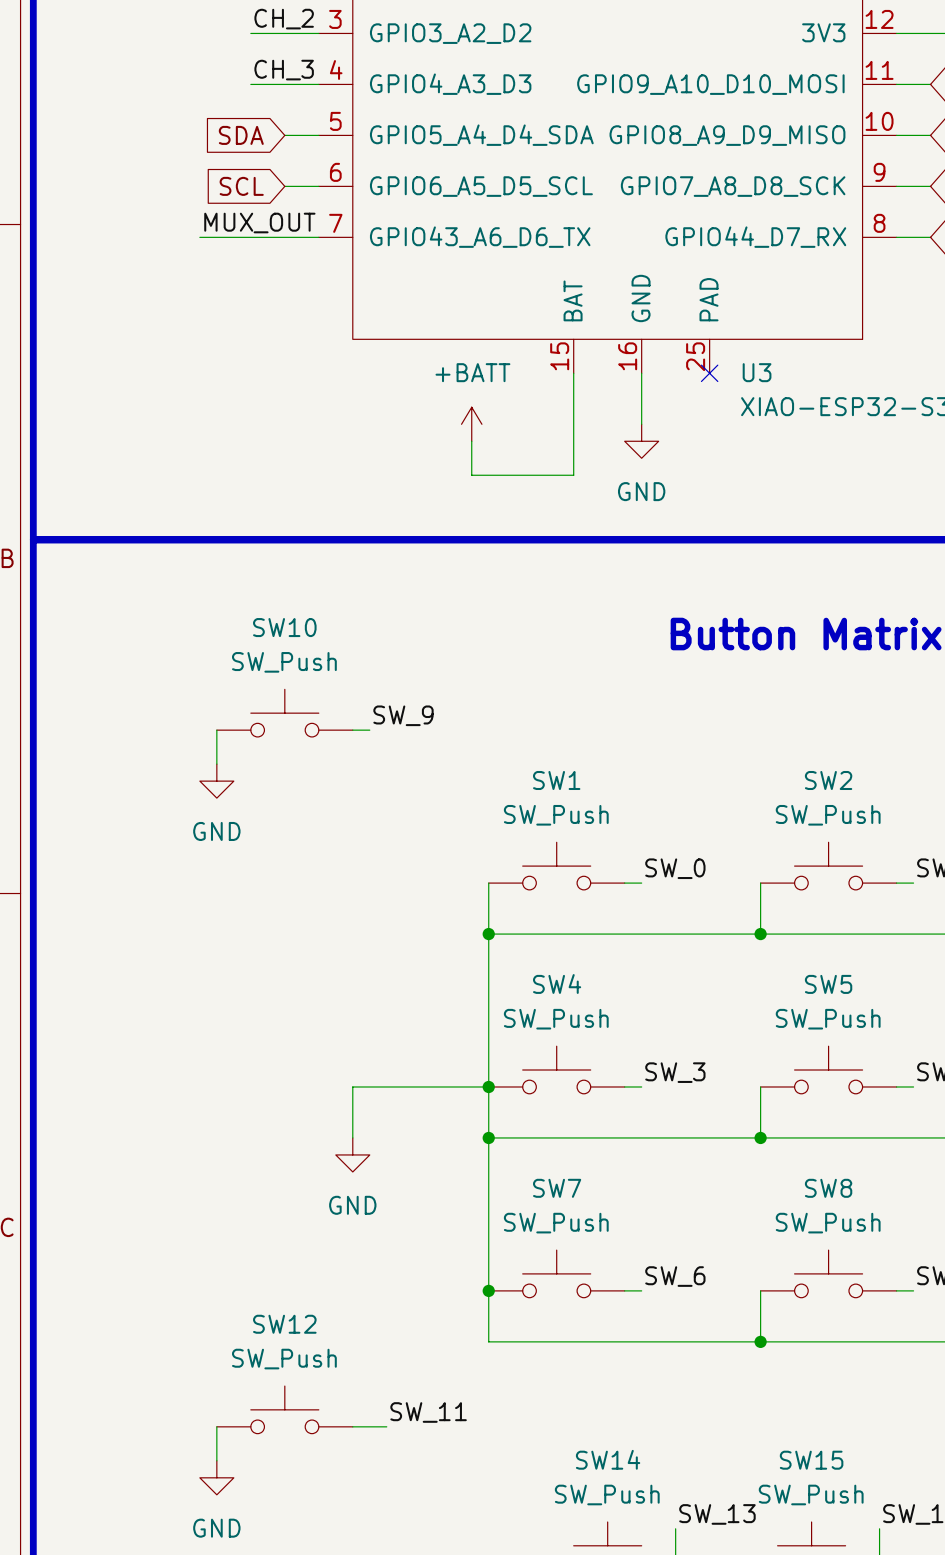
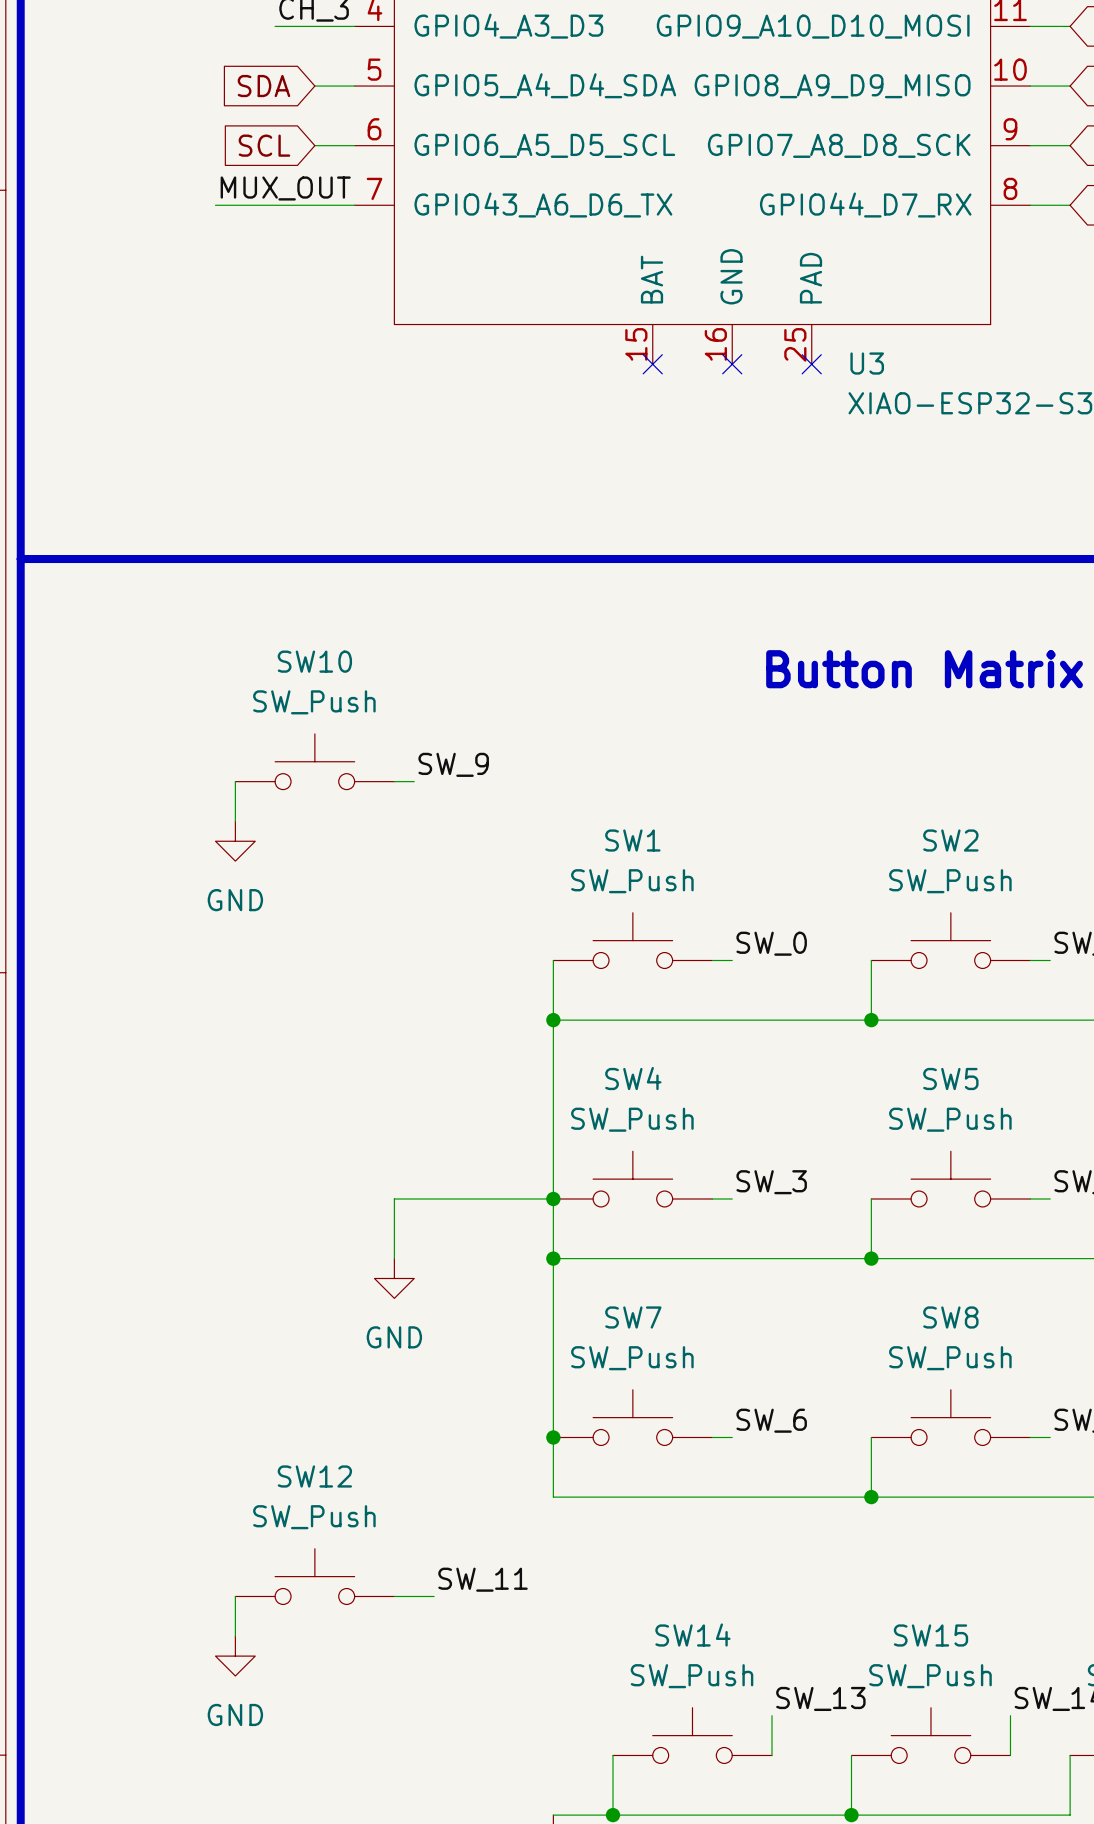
wire: (573, 373) (573, 475) (471, 475) (471, 441) -> none
no-connect mark: none -> (652, 364)
wire: (641, 373) (641, 424) -> none
no-connect mark: none -> (732, 364)
power symbol: +BATT (471, 424) -> none
power symbol: GND (641, 441) -> none

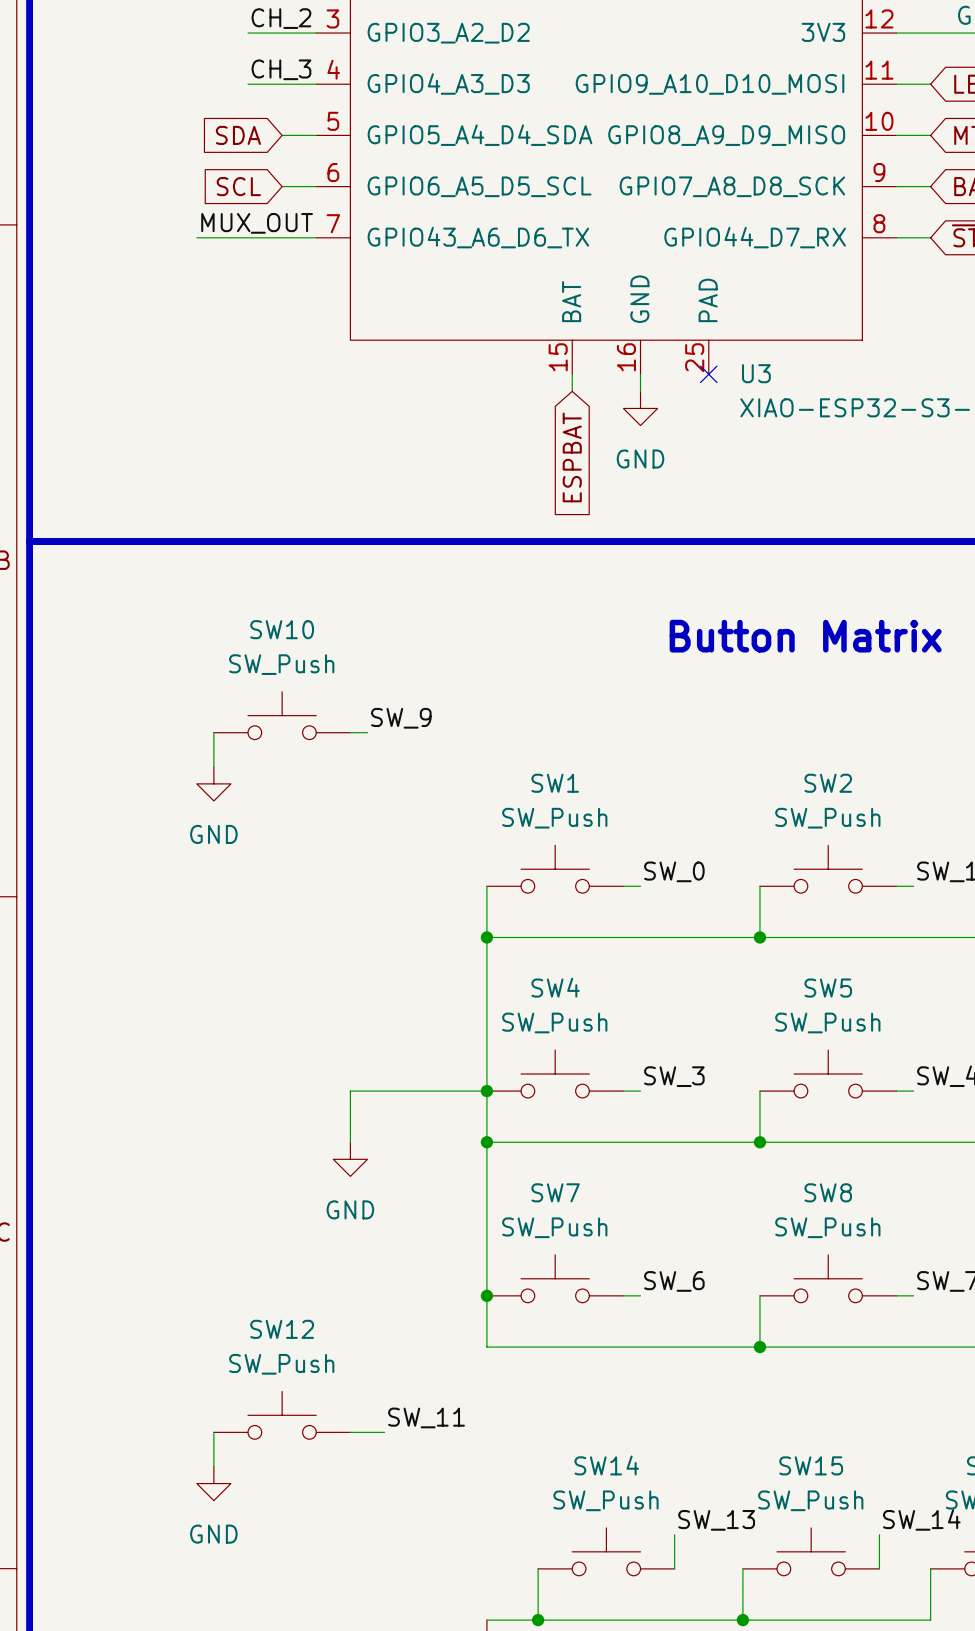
wire: none -> (572, 374) (572, 391)
no-connect mark: (652, 364) -> none
wire: none -> (640, 374) (640, 391)
no-connect mark: (732, 364) -> none
power symbol: none -> GND (640, 408)
global label: none -> ESPBAT (572, 457)

